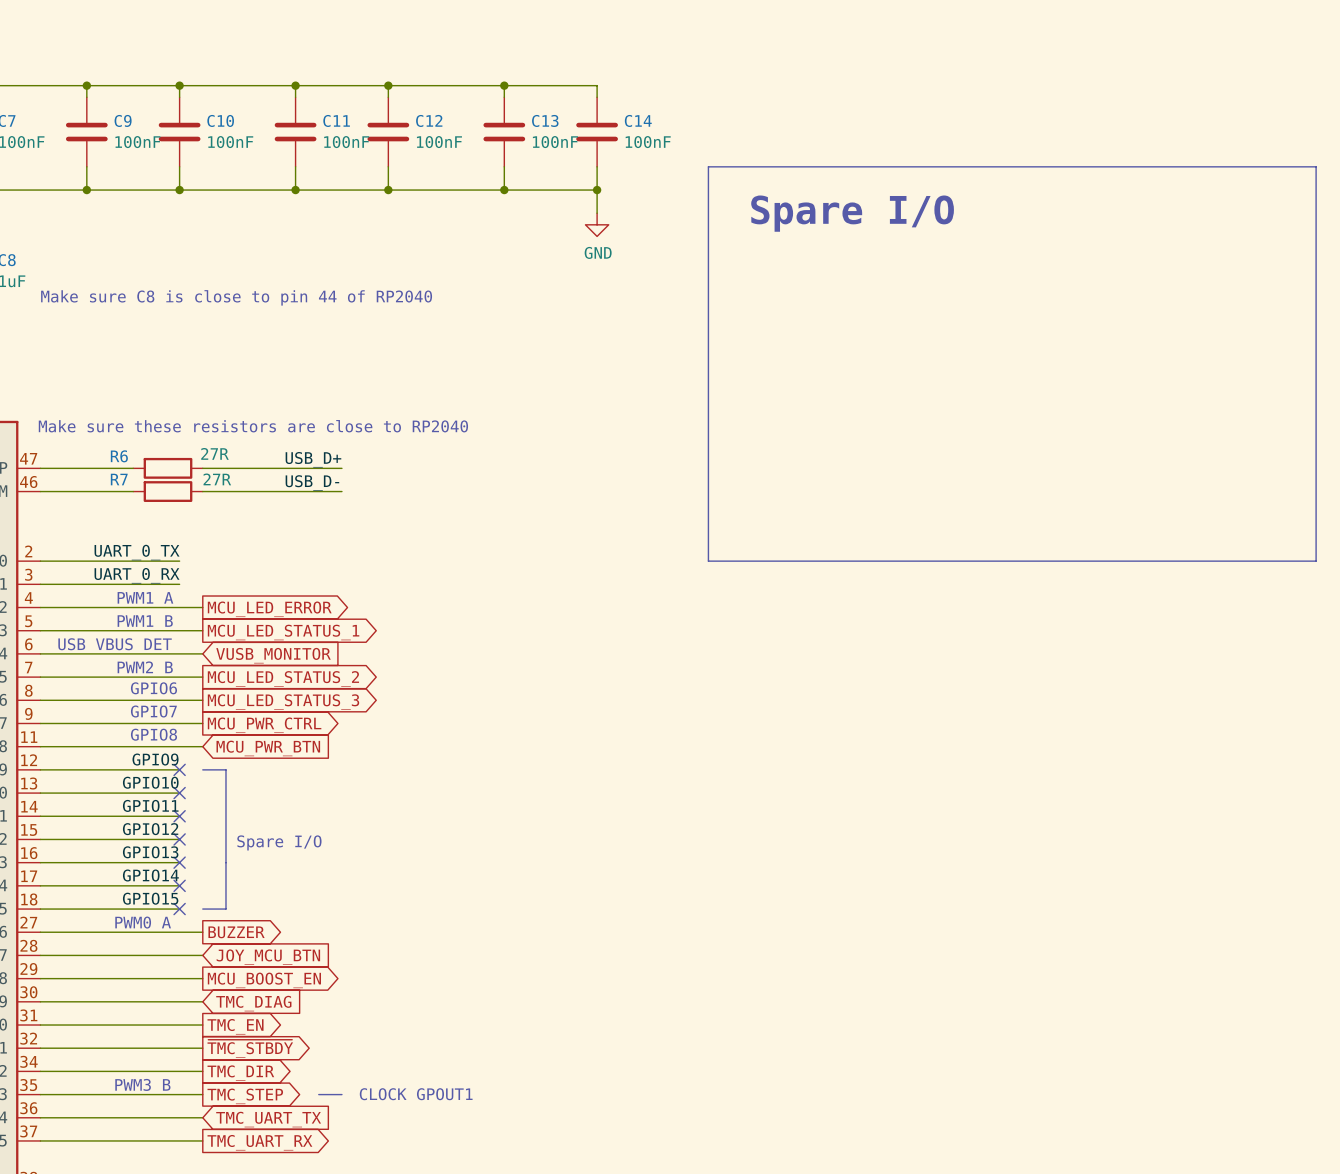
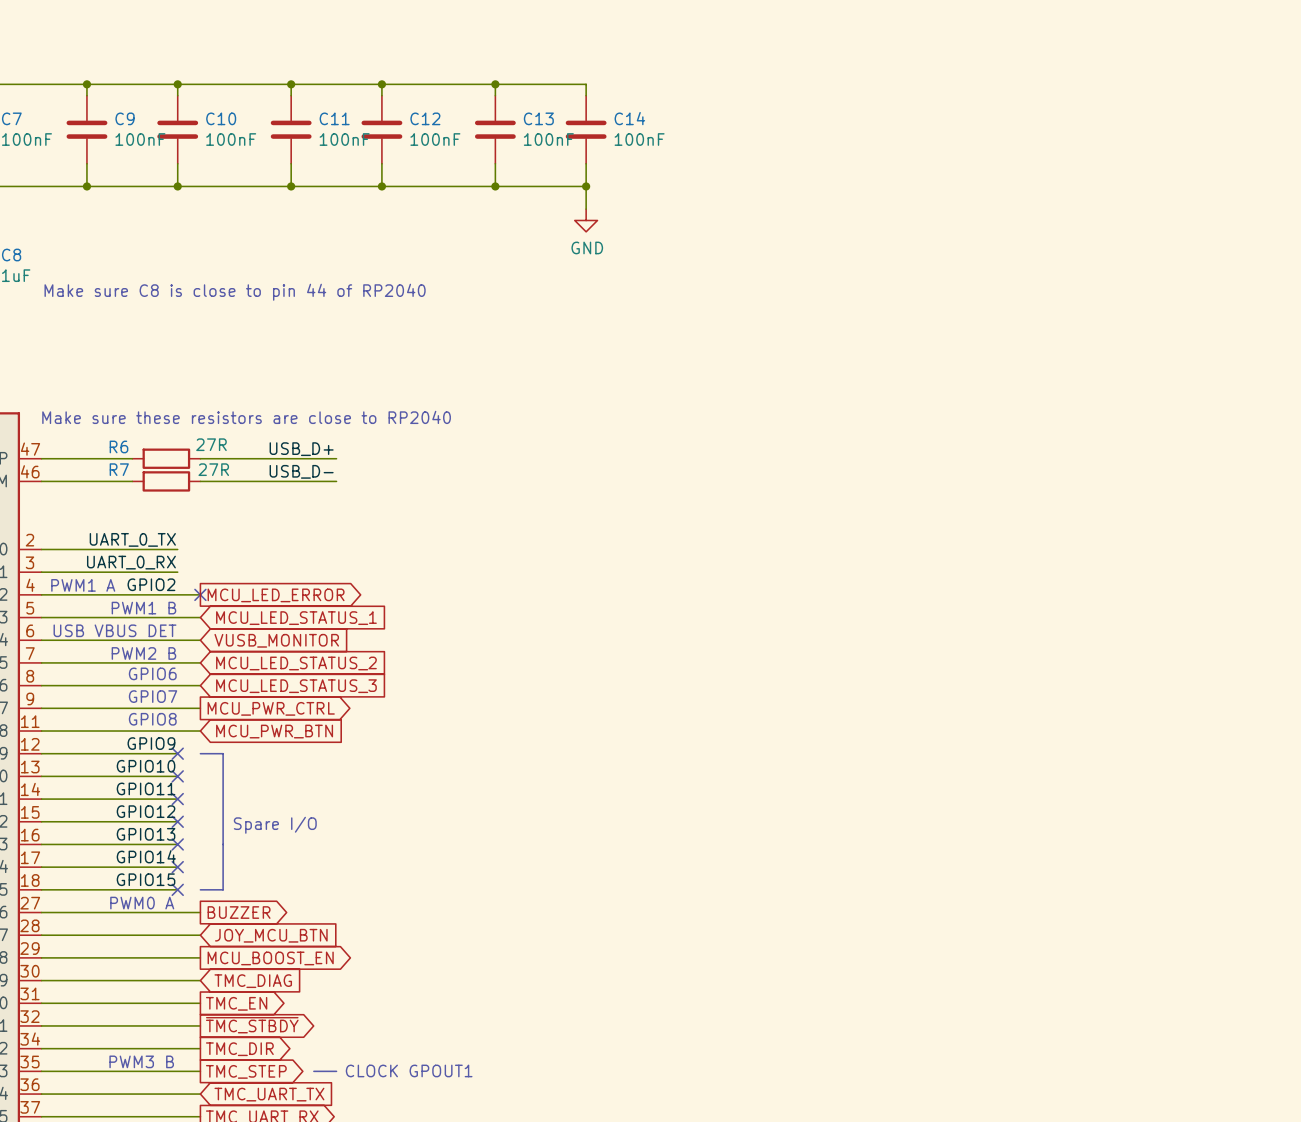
line: (708, 166) (1316, 166) (1316, 561) (708, 561) (708, 166) -> none
text: Spare I/O (852, 213) -> none
text position: PWM1 A (145, 597) -> PWM1 A (83, 585)
label: none -> GPIO2 (151, 584)
no-connect mark: none -> (200, 594)
global label shape: output (283, 632) -> input (296, 618)
global label shape: output (283, 678) -> input (296, 663)
global label shape: output (283, 702) -> input (296, 686)

